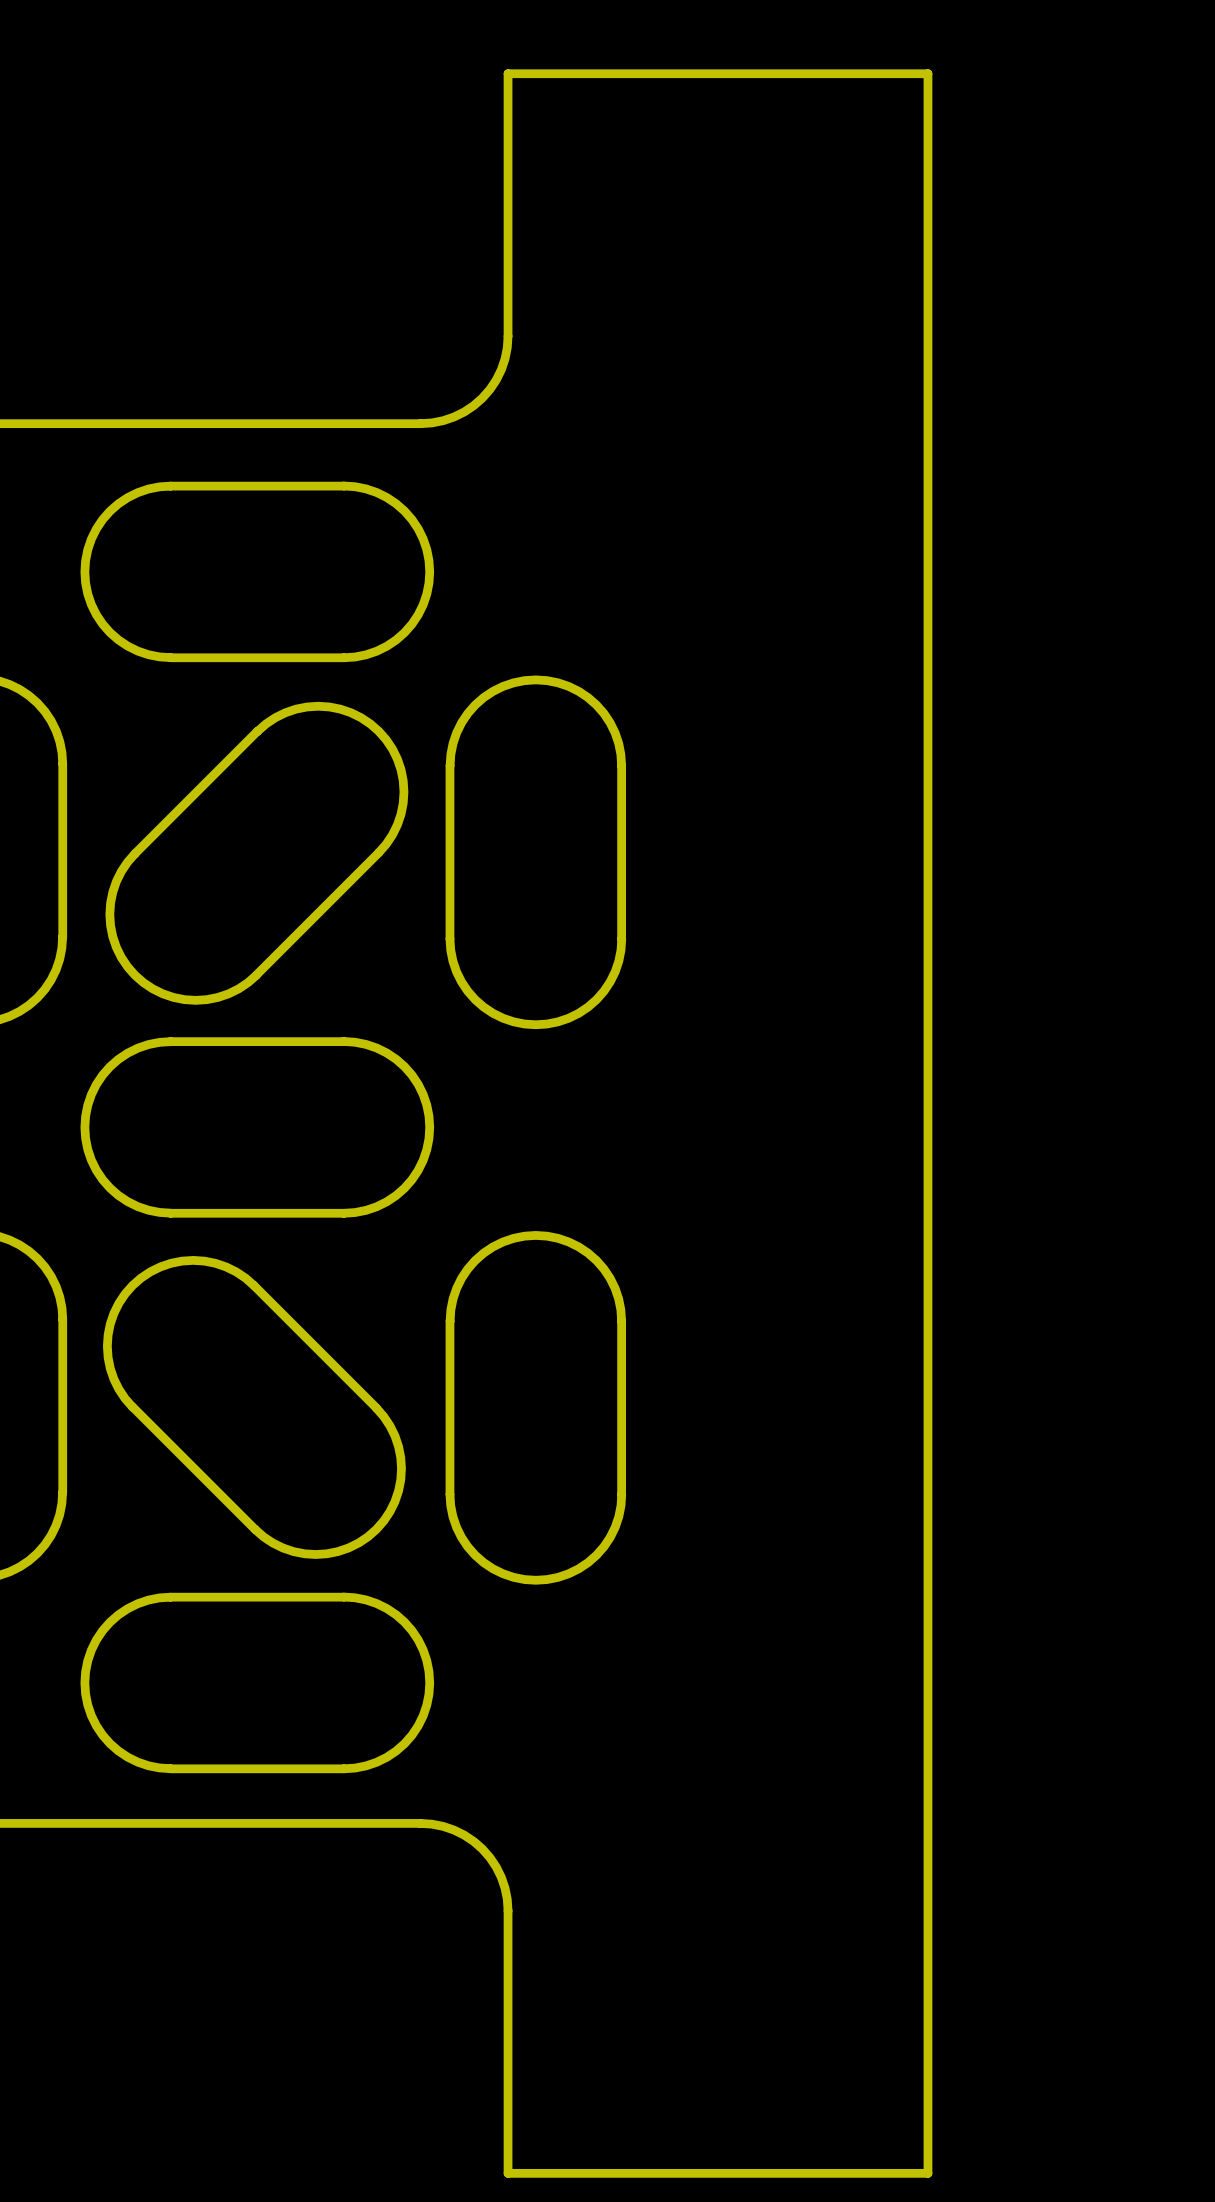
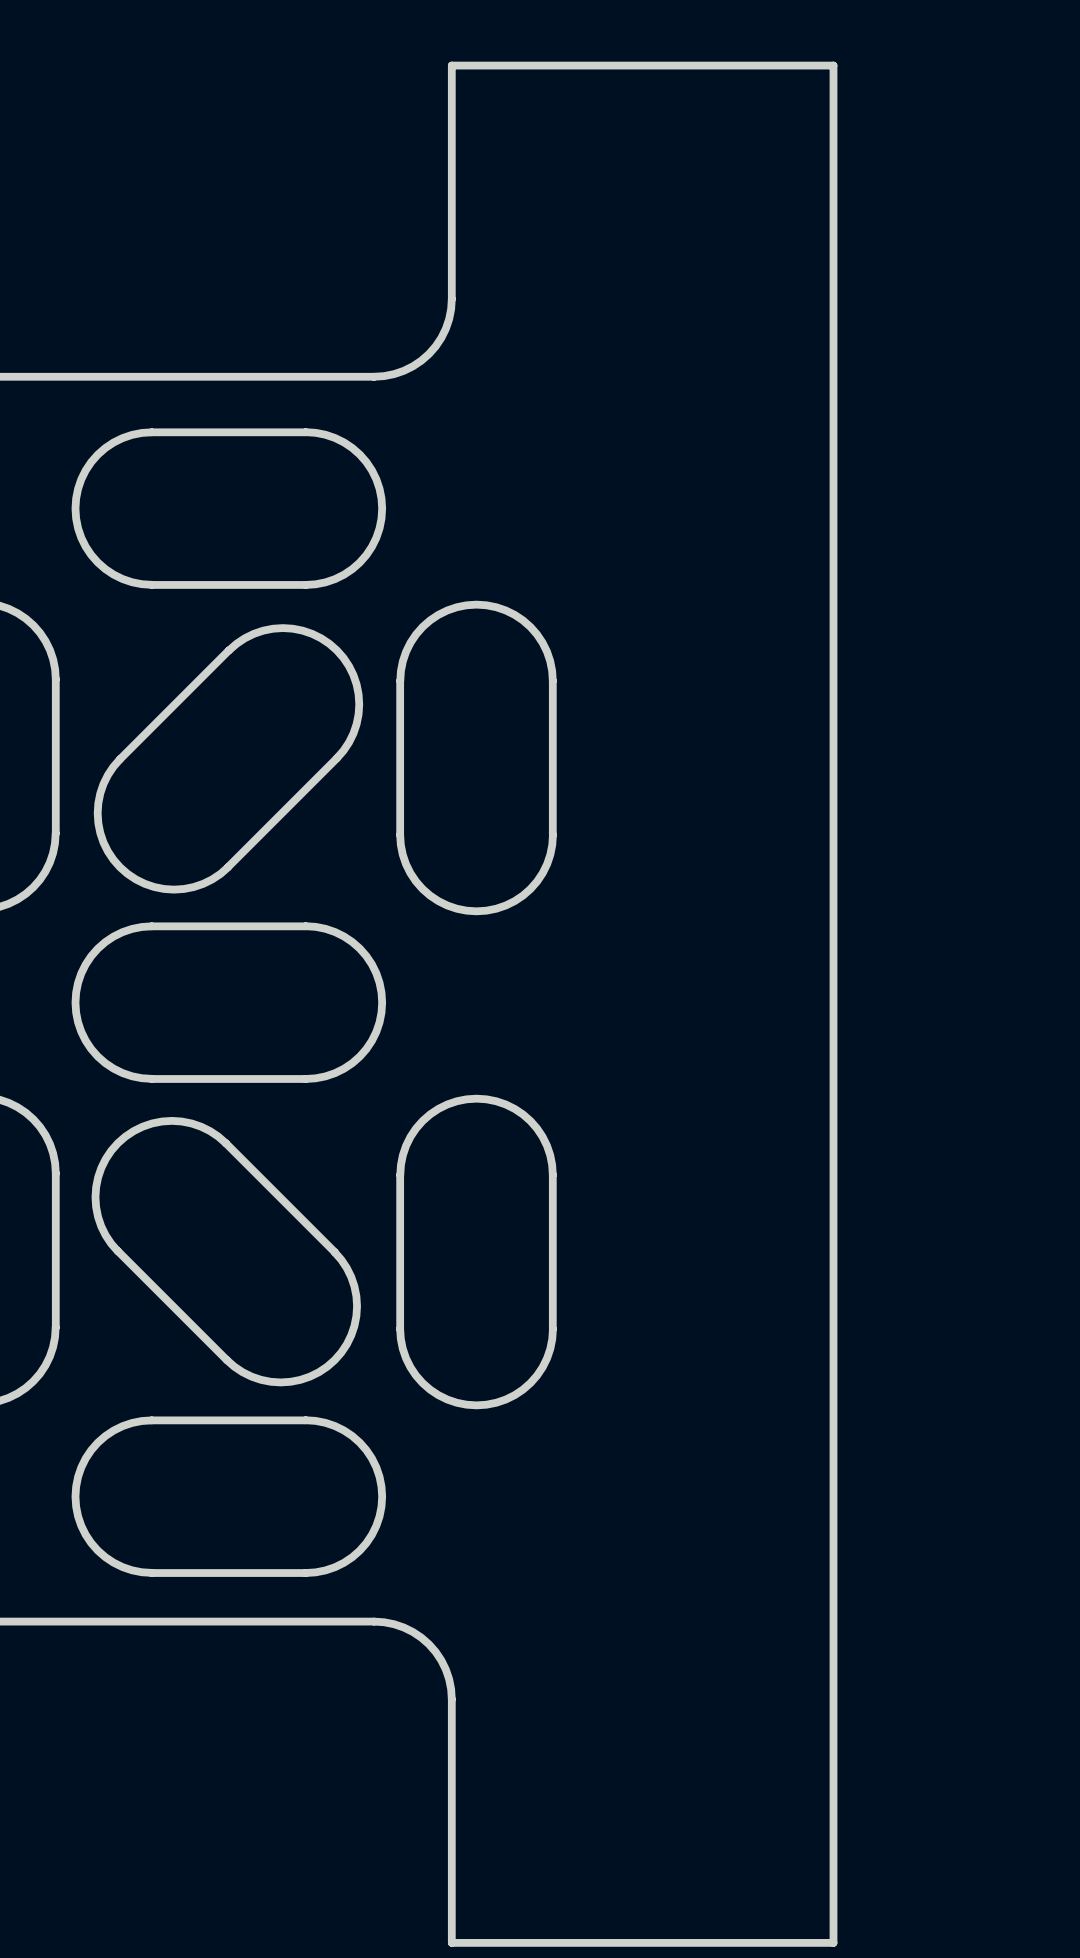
board edge: (927, 73) (927, 2173) (508, 2173) -> (825, 65) (833, 65) (833, 1942) (451, 1942) (451, 1932)

